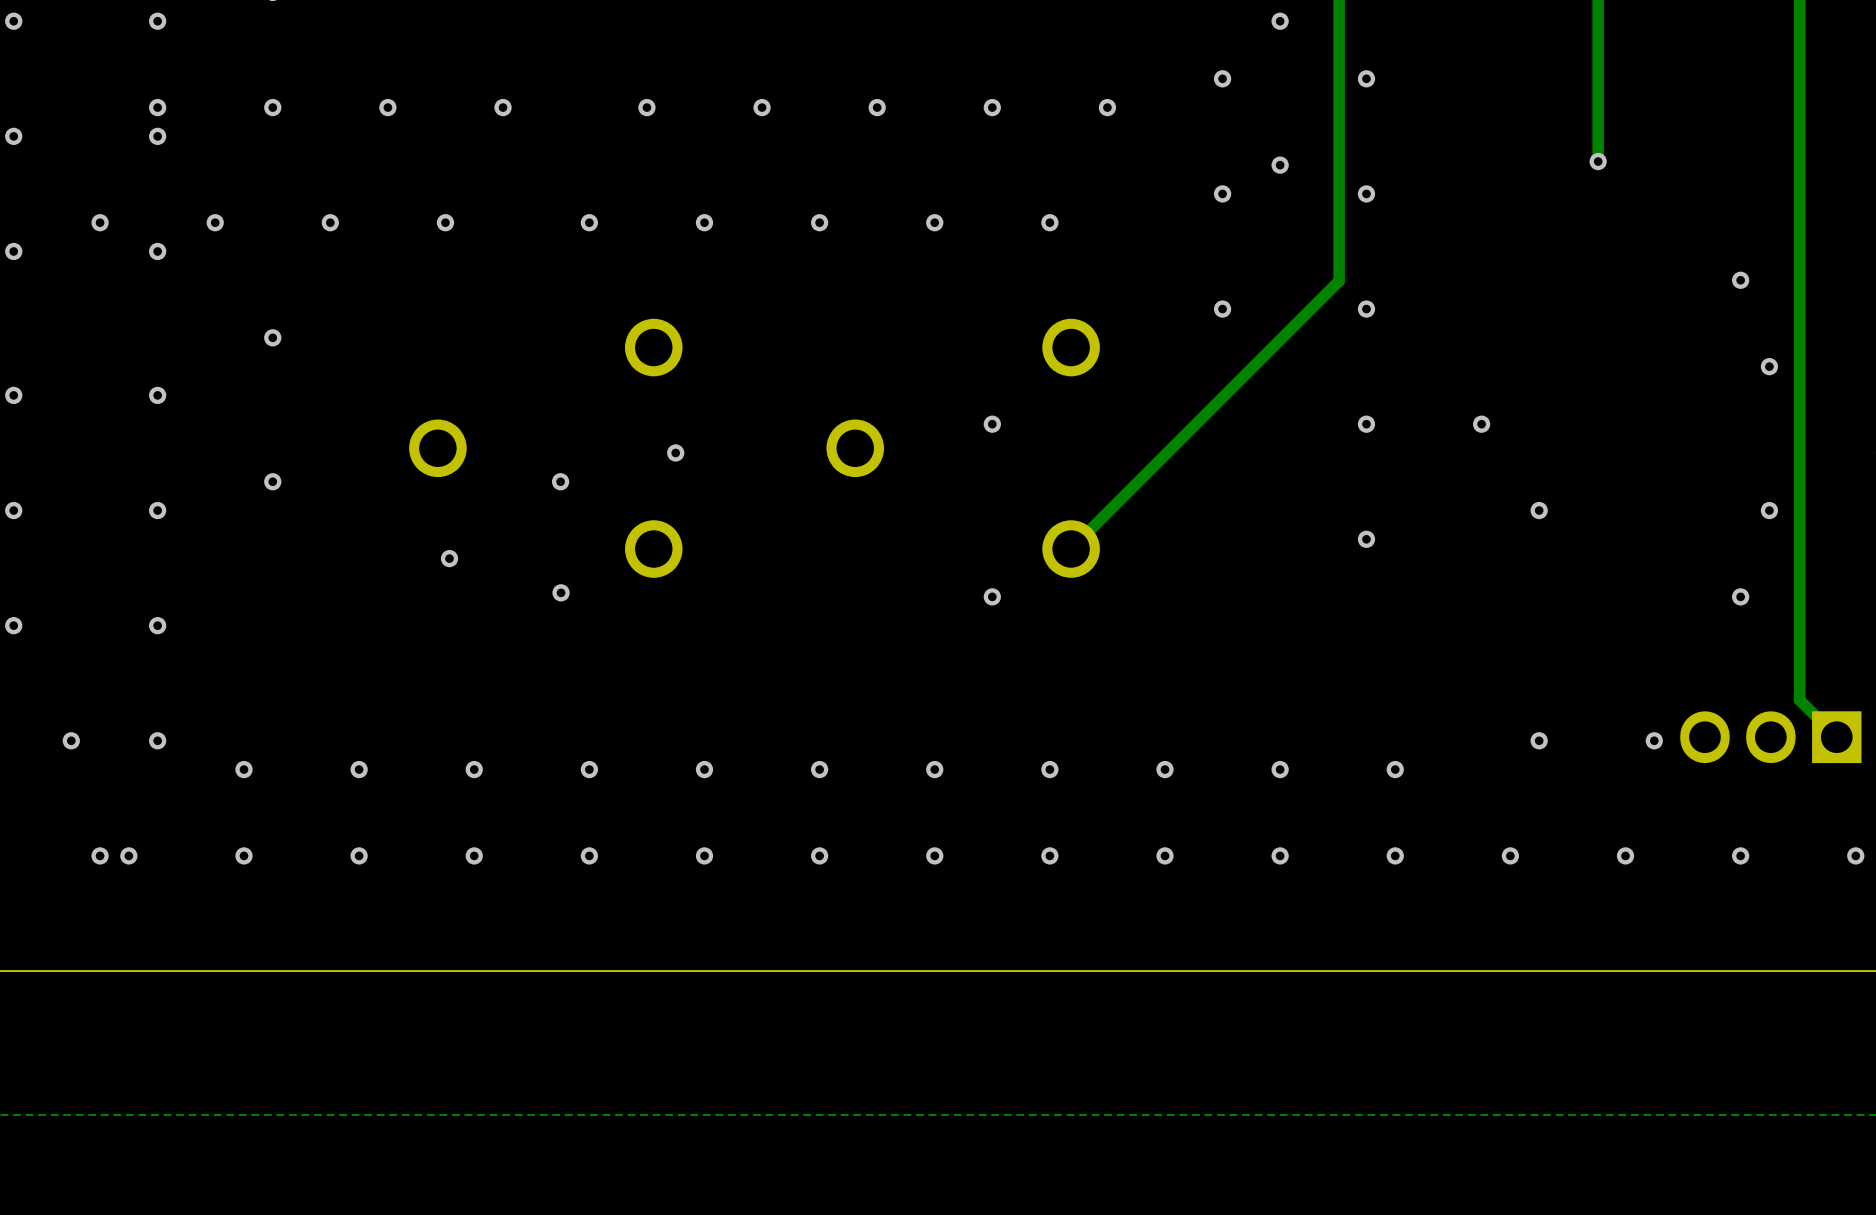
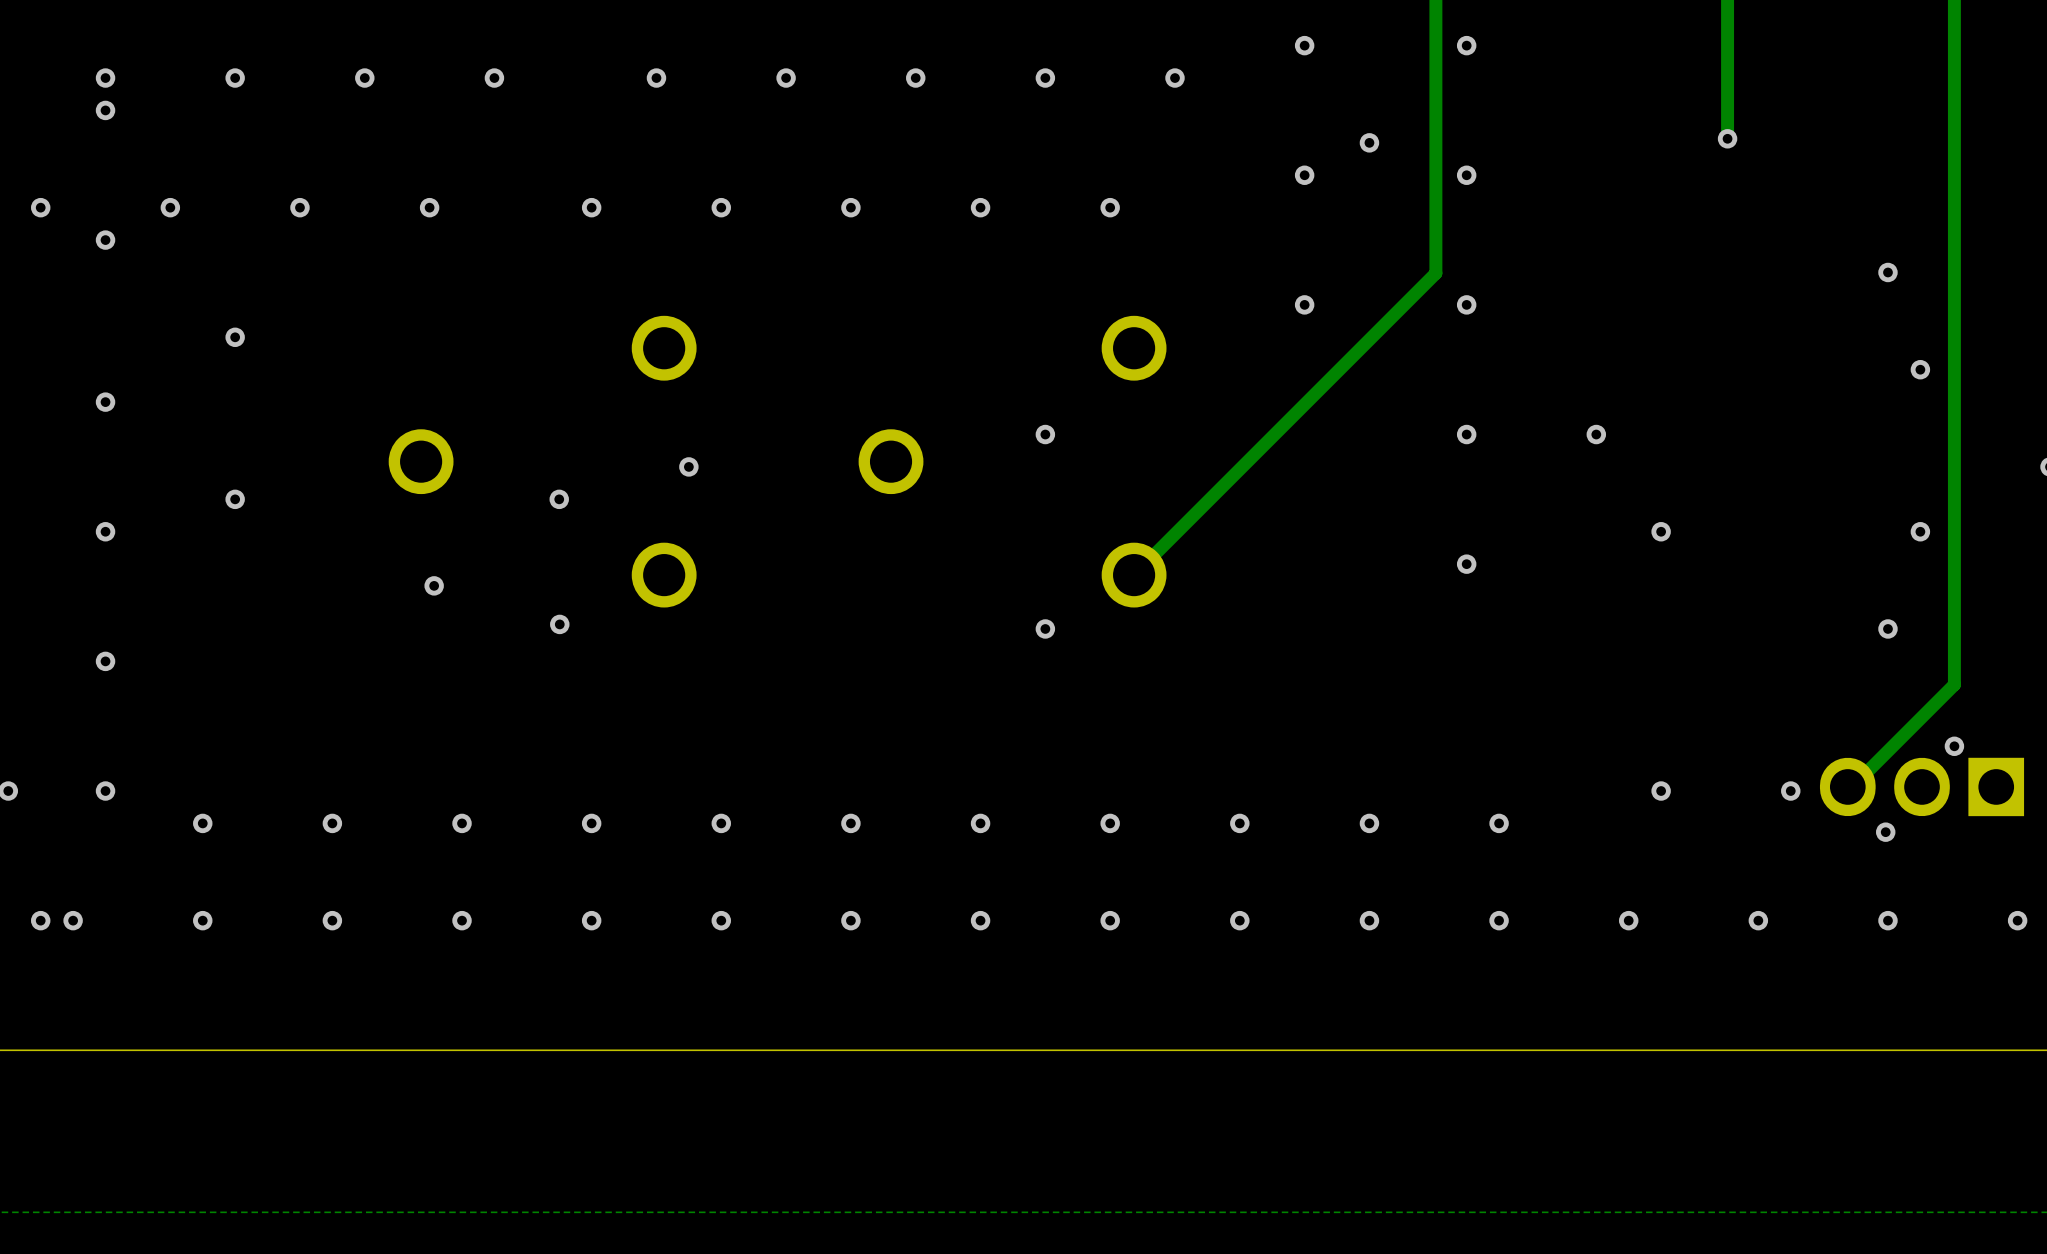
track: (1799, 646) (1799, 700) (1836, 737) -> (1954, 684) (1847, 791)
via: none -> (1954, 746)
via: none -> (1885, 832)

